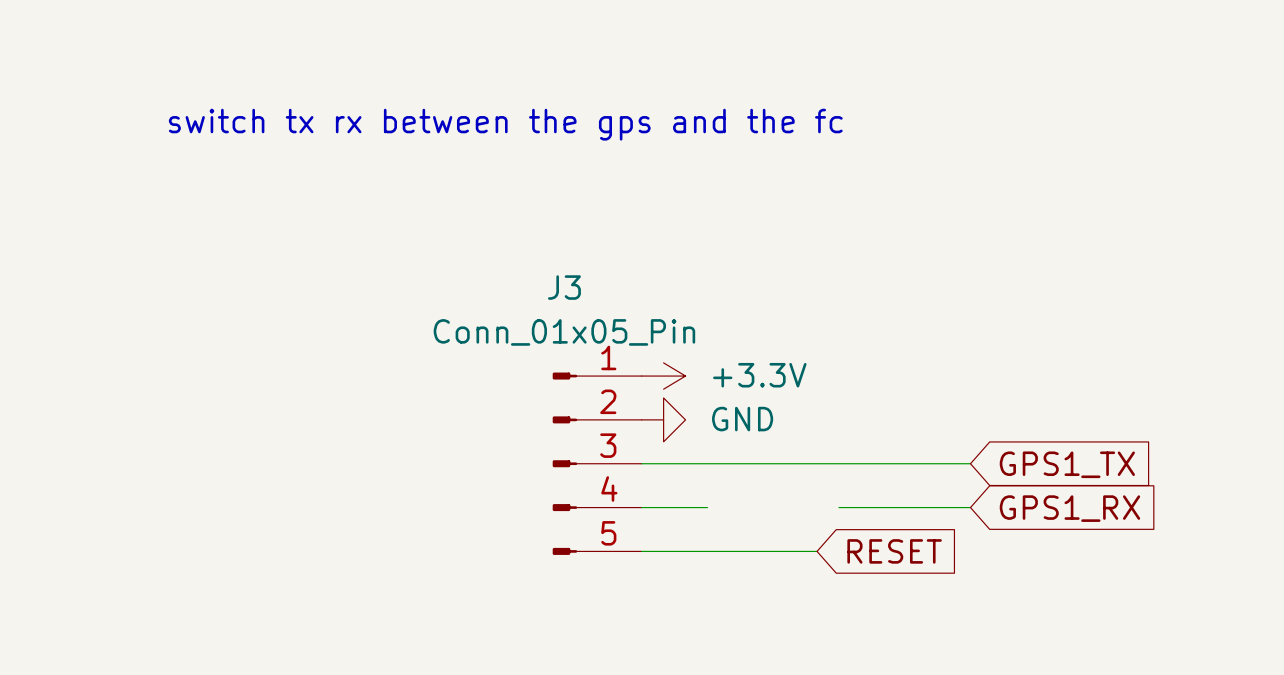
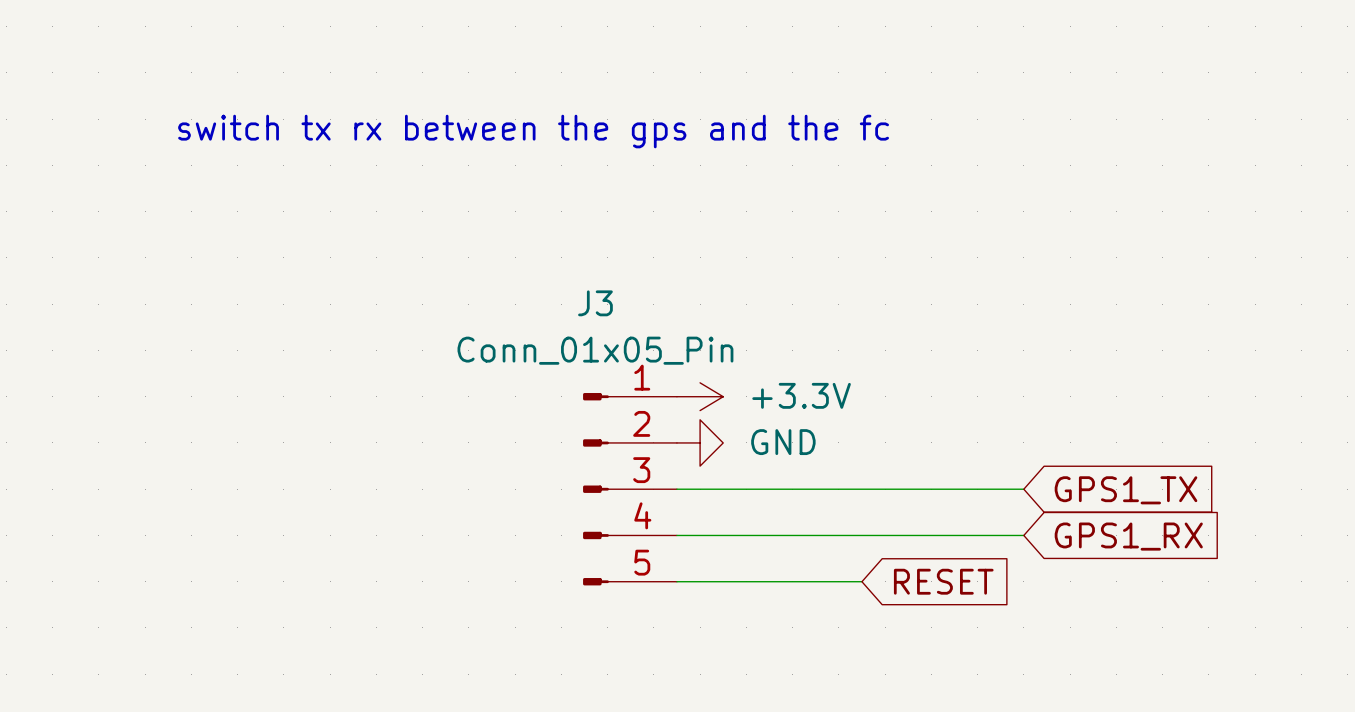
wire: none -> (746, 535) (885, 535)

